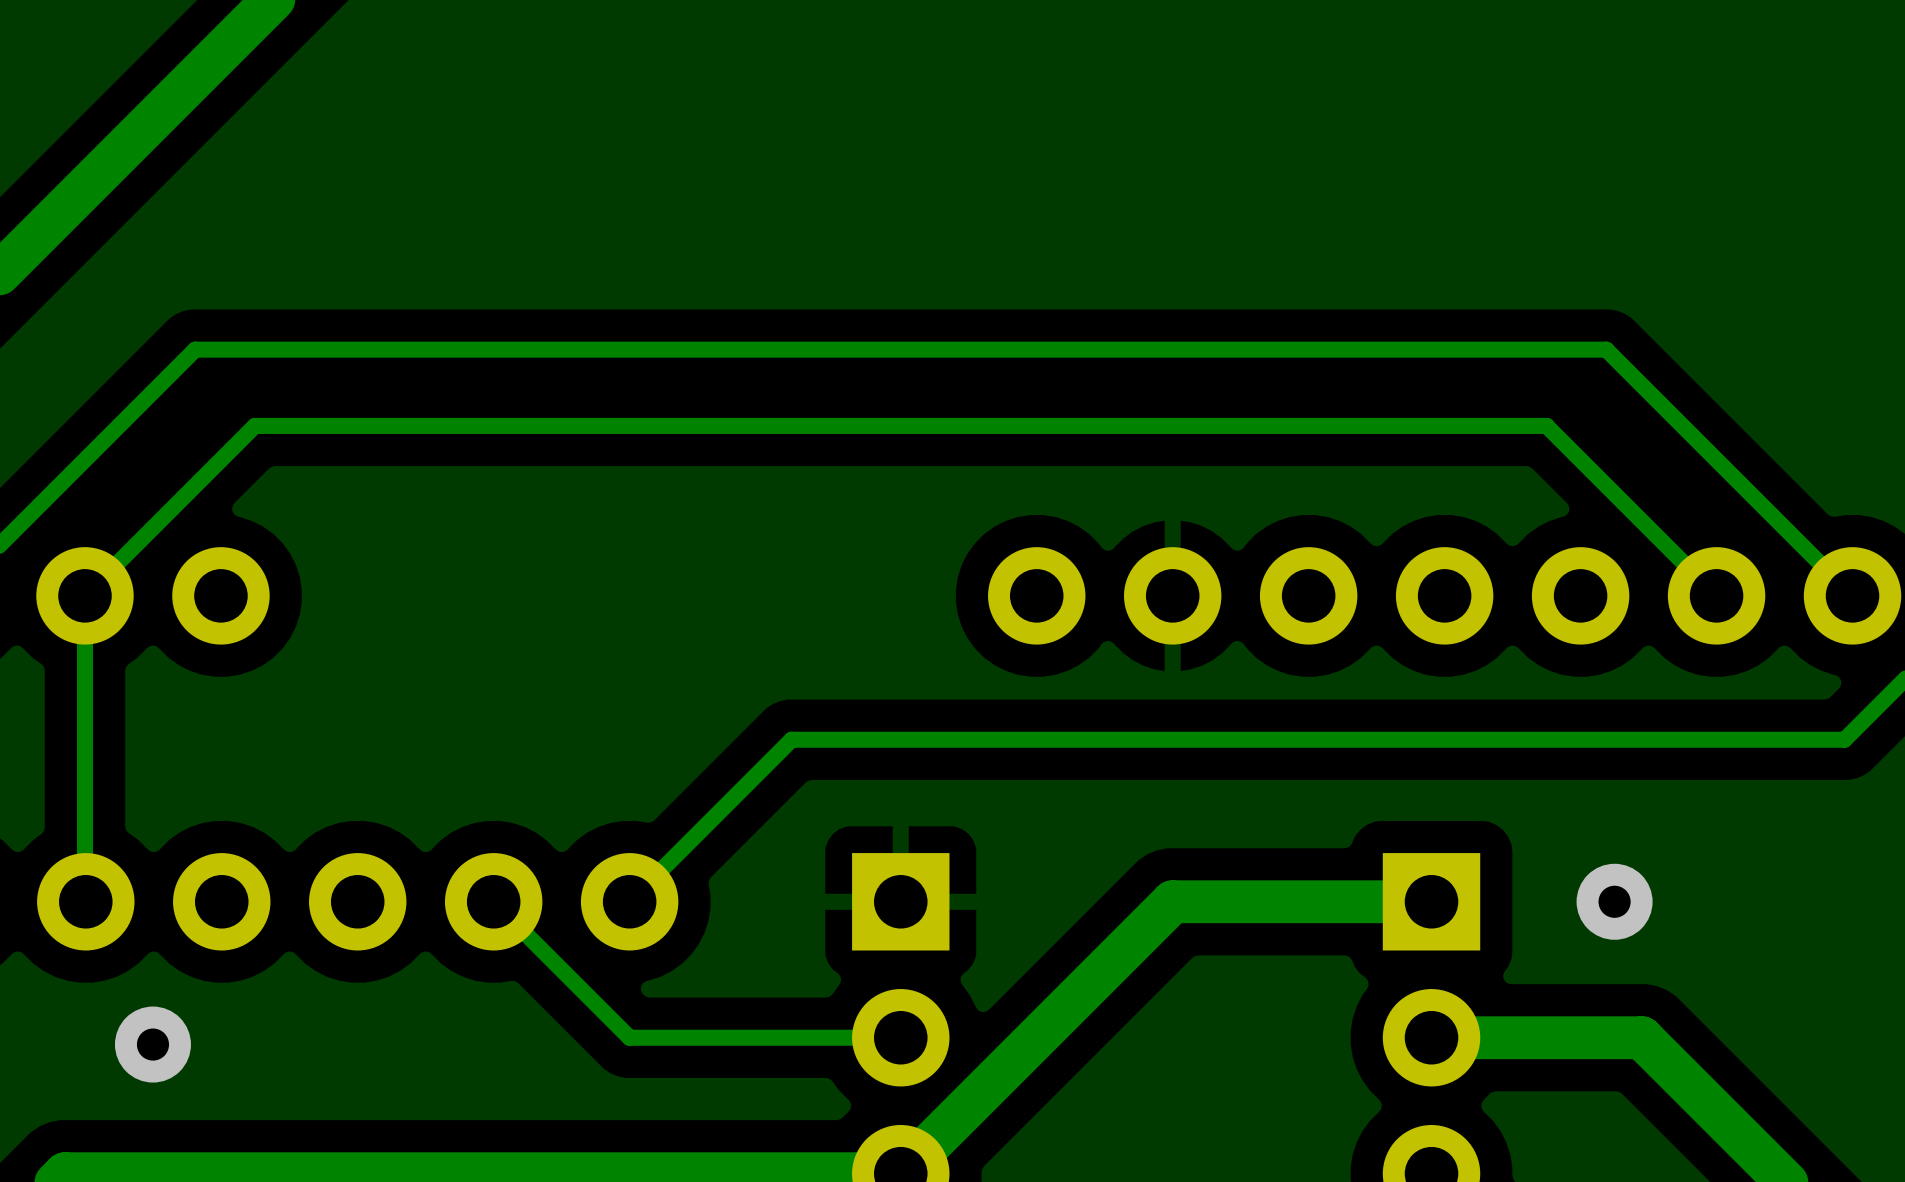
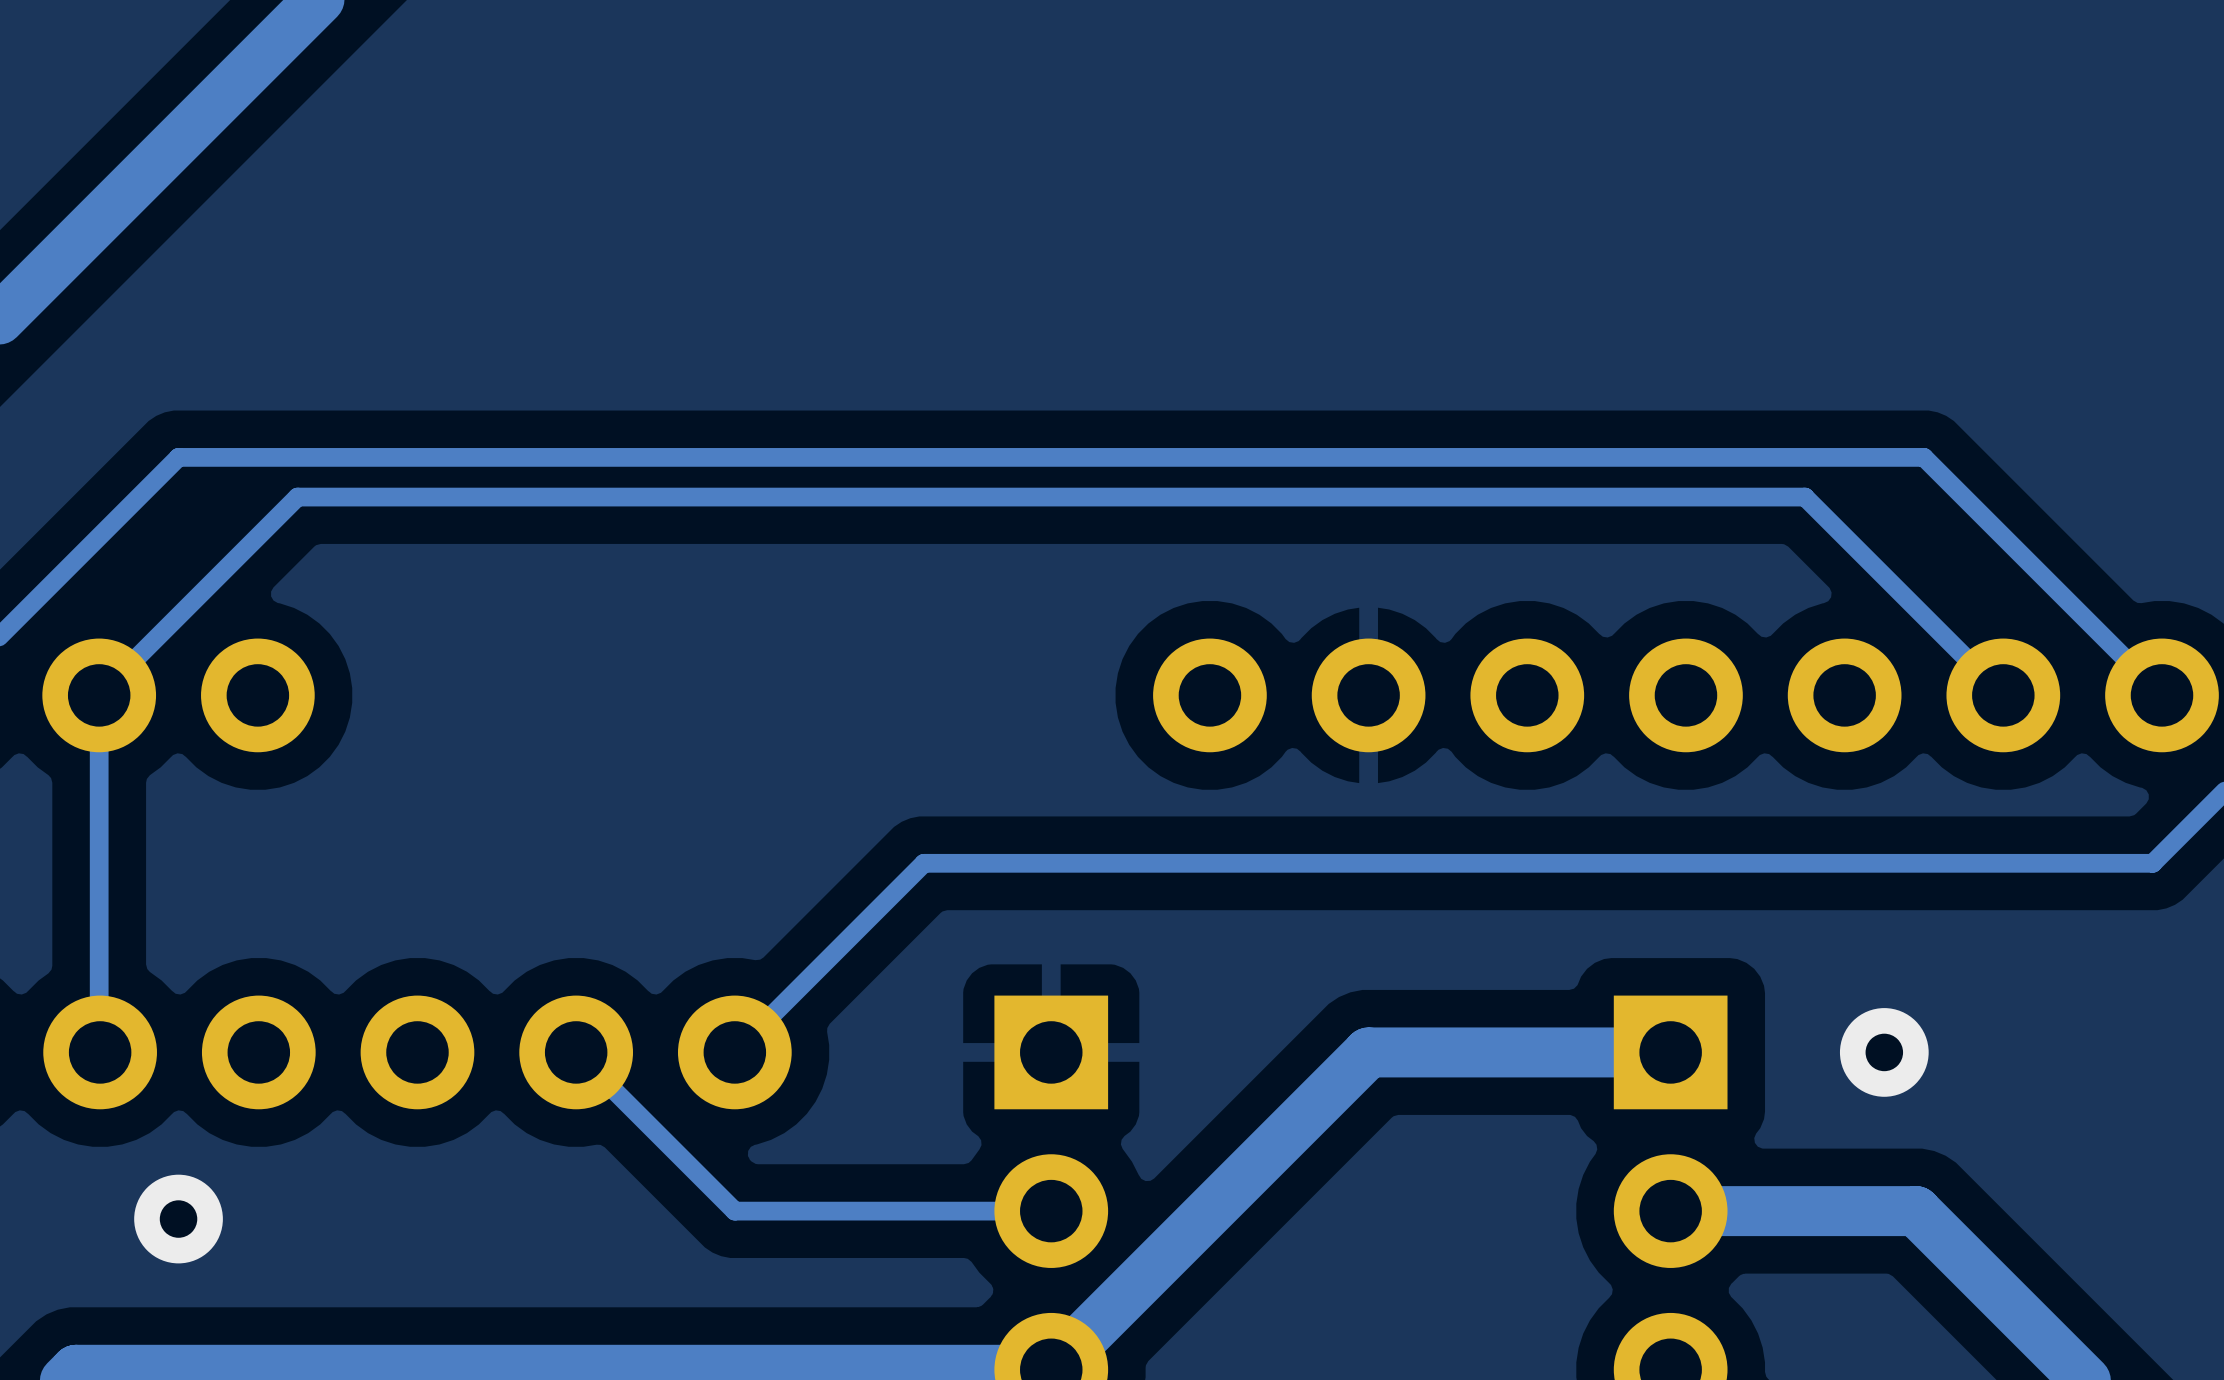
track: (1648, 391) (1606, 349) (195, 349) (152, 391) -> (1923, 457) (178, 457)

